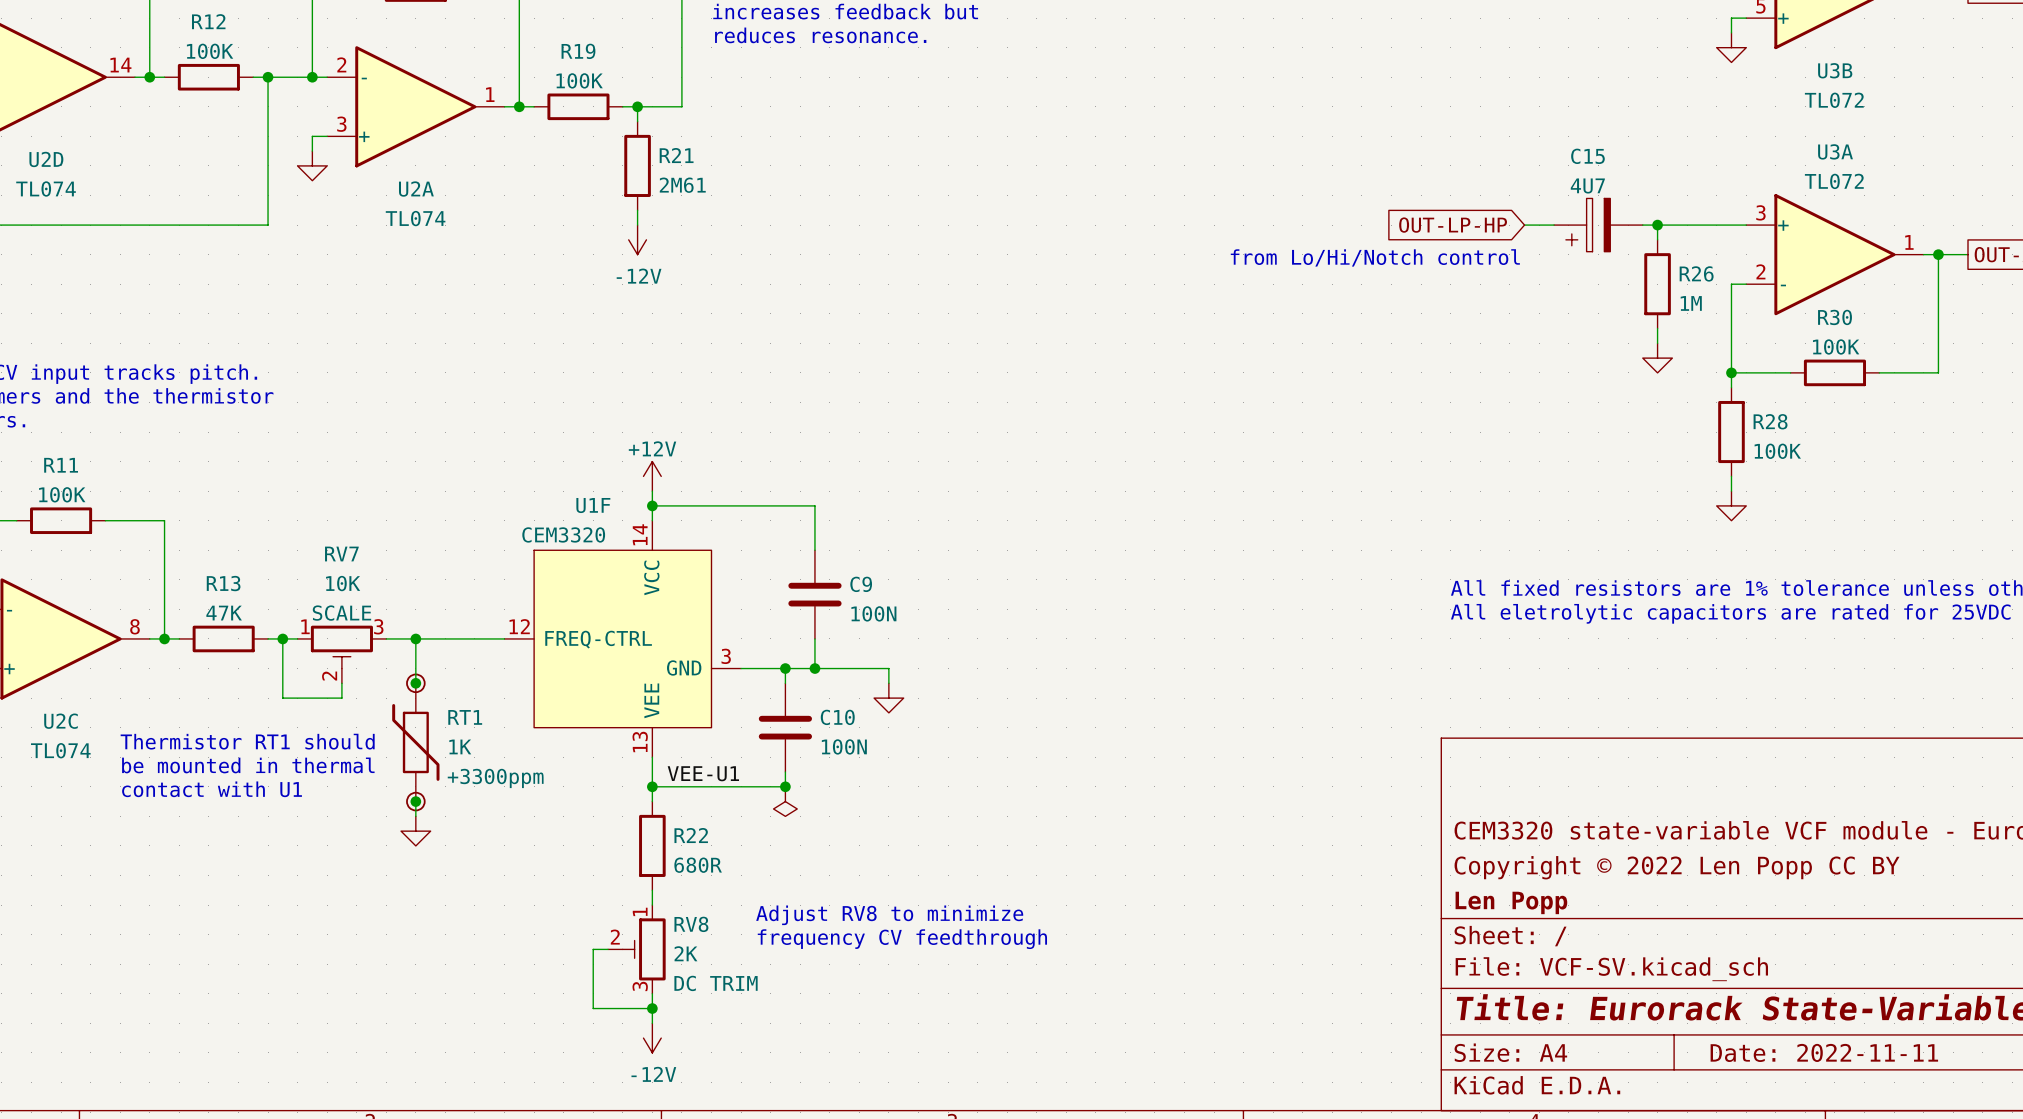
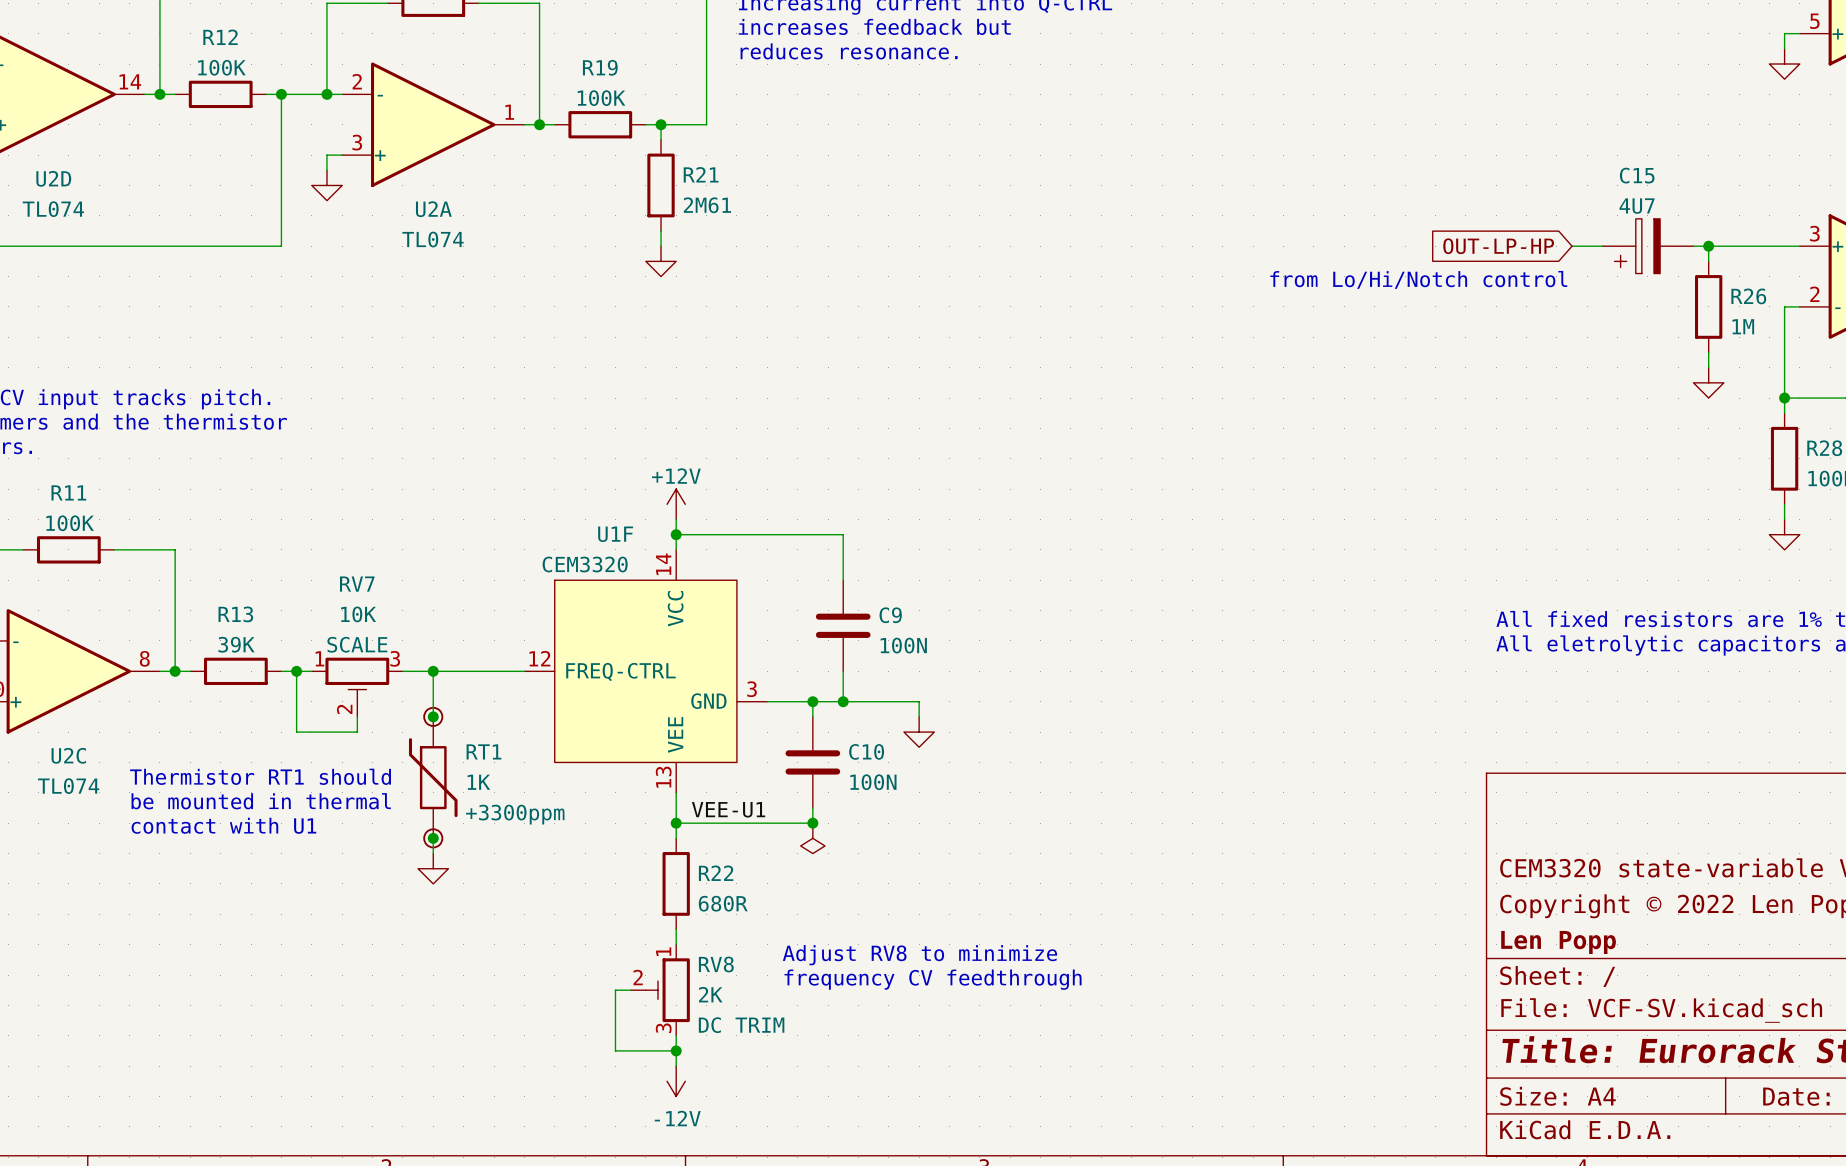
power symbol shape: [628, 225, 647, 255] -> [645, 246, 677, 277]
power symbol text: -12V (639, 276) -> none
R13 value: 47K (224, 613) -> 39K (236, 644)

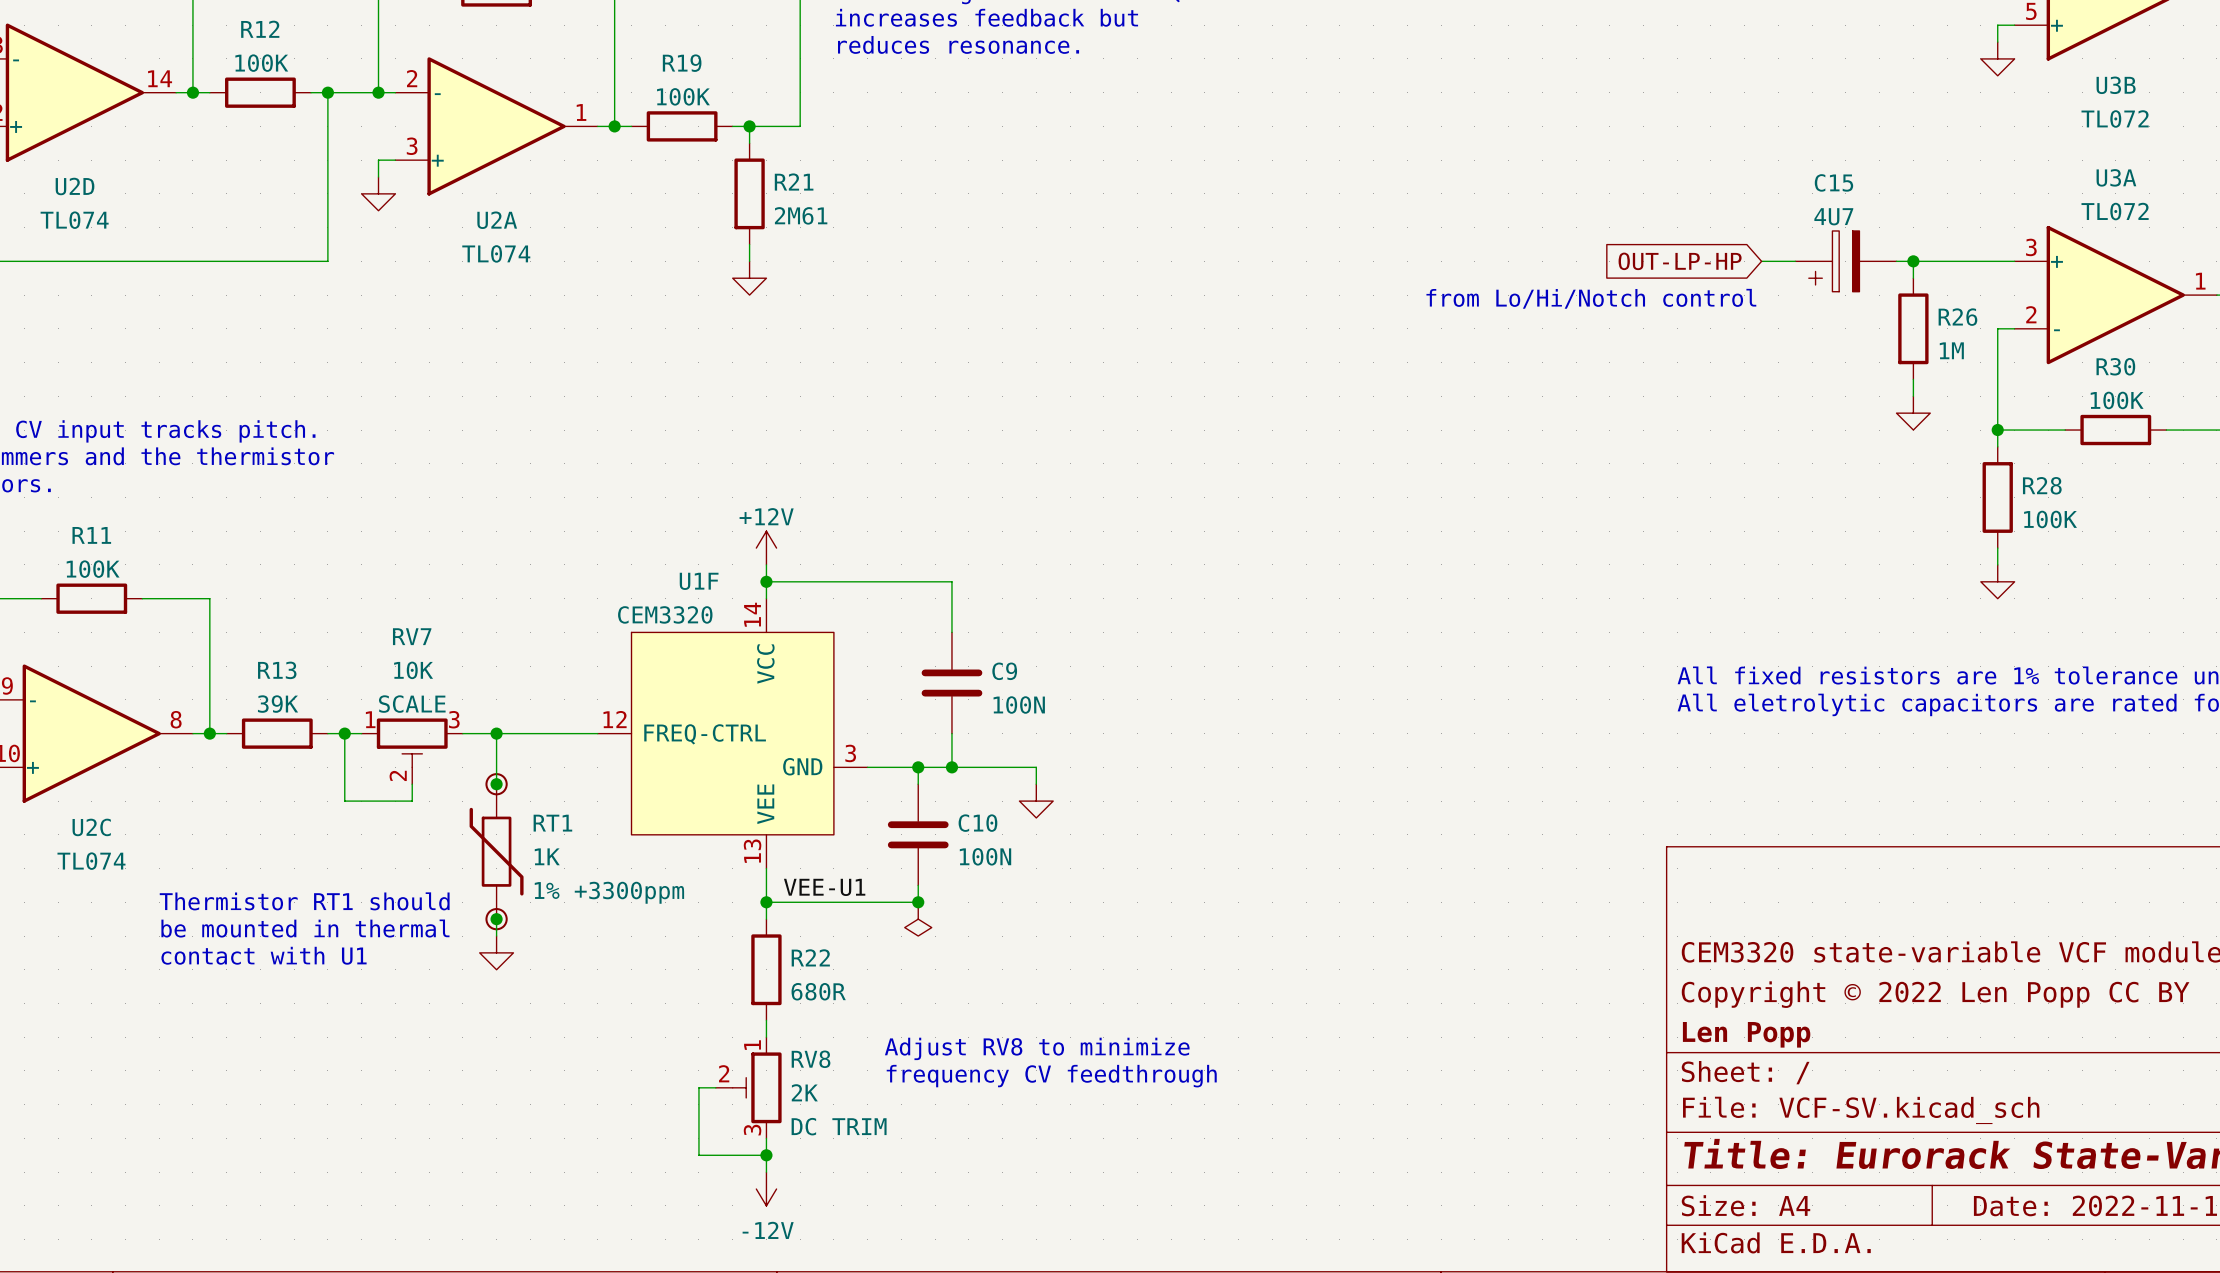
text: Thermistor RT1 should (260, 776) -> none
text position: be mounted in thermal (261, 801) -> be mounted in thermal (305, 928)
RT1 text: +3300ppm (515, 814) -> 1% +3300ppm (609, 892)
text: contact with U1 (223, 825) -> Thermistor RT1 should (304, 901)
text: none -> contact with U1 (264, 955)

